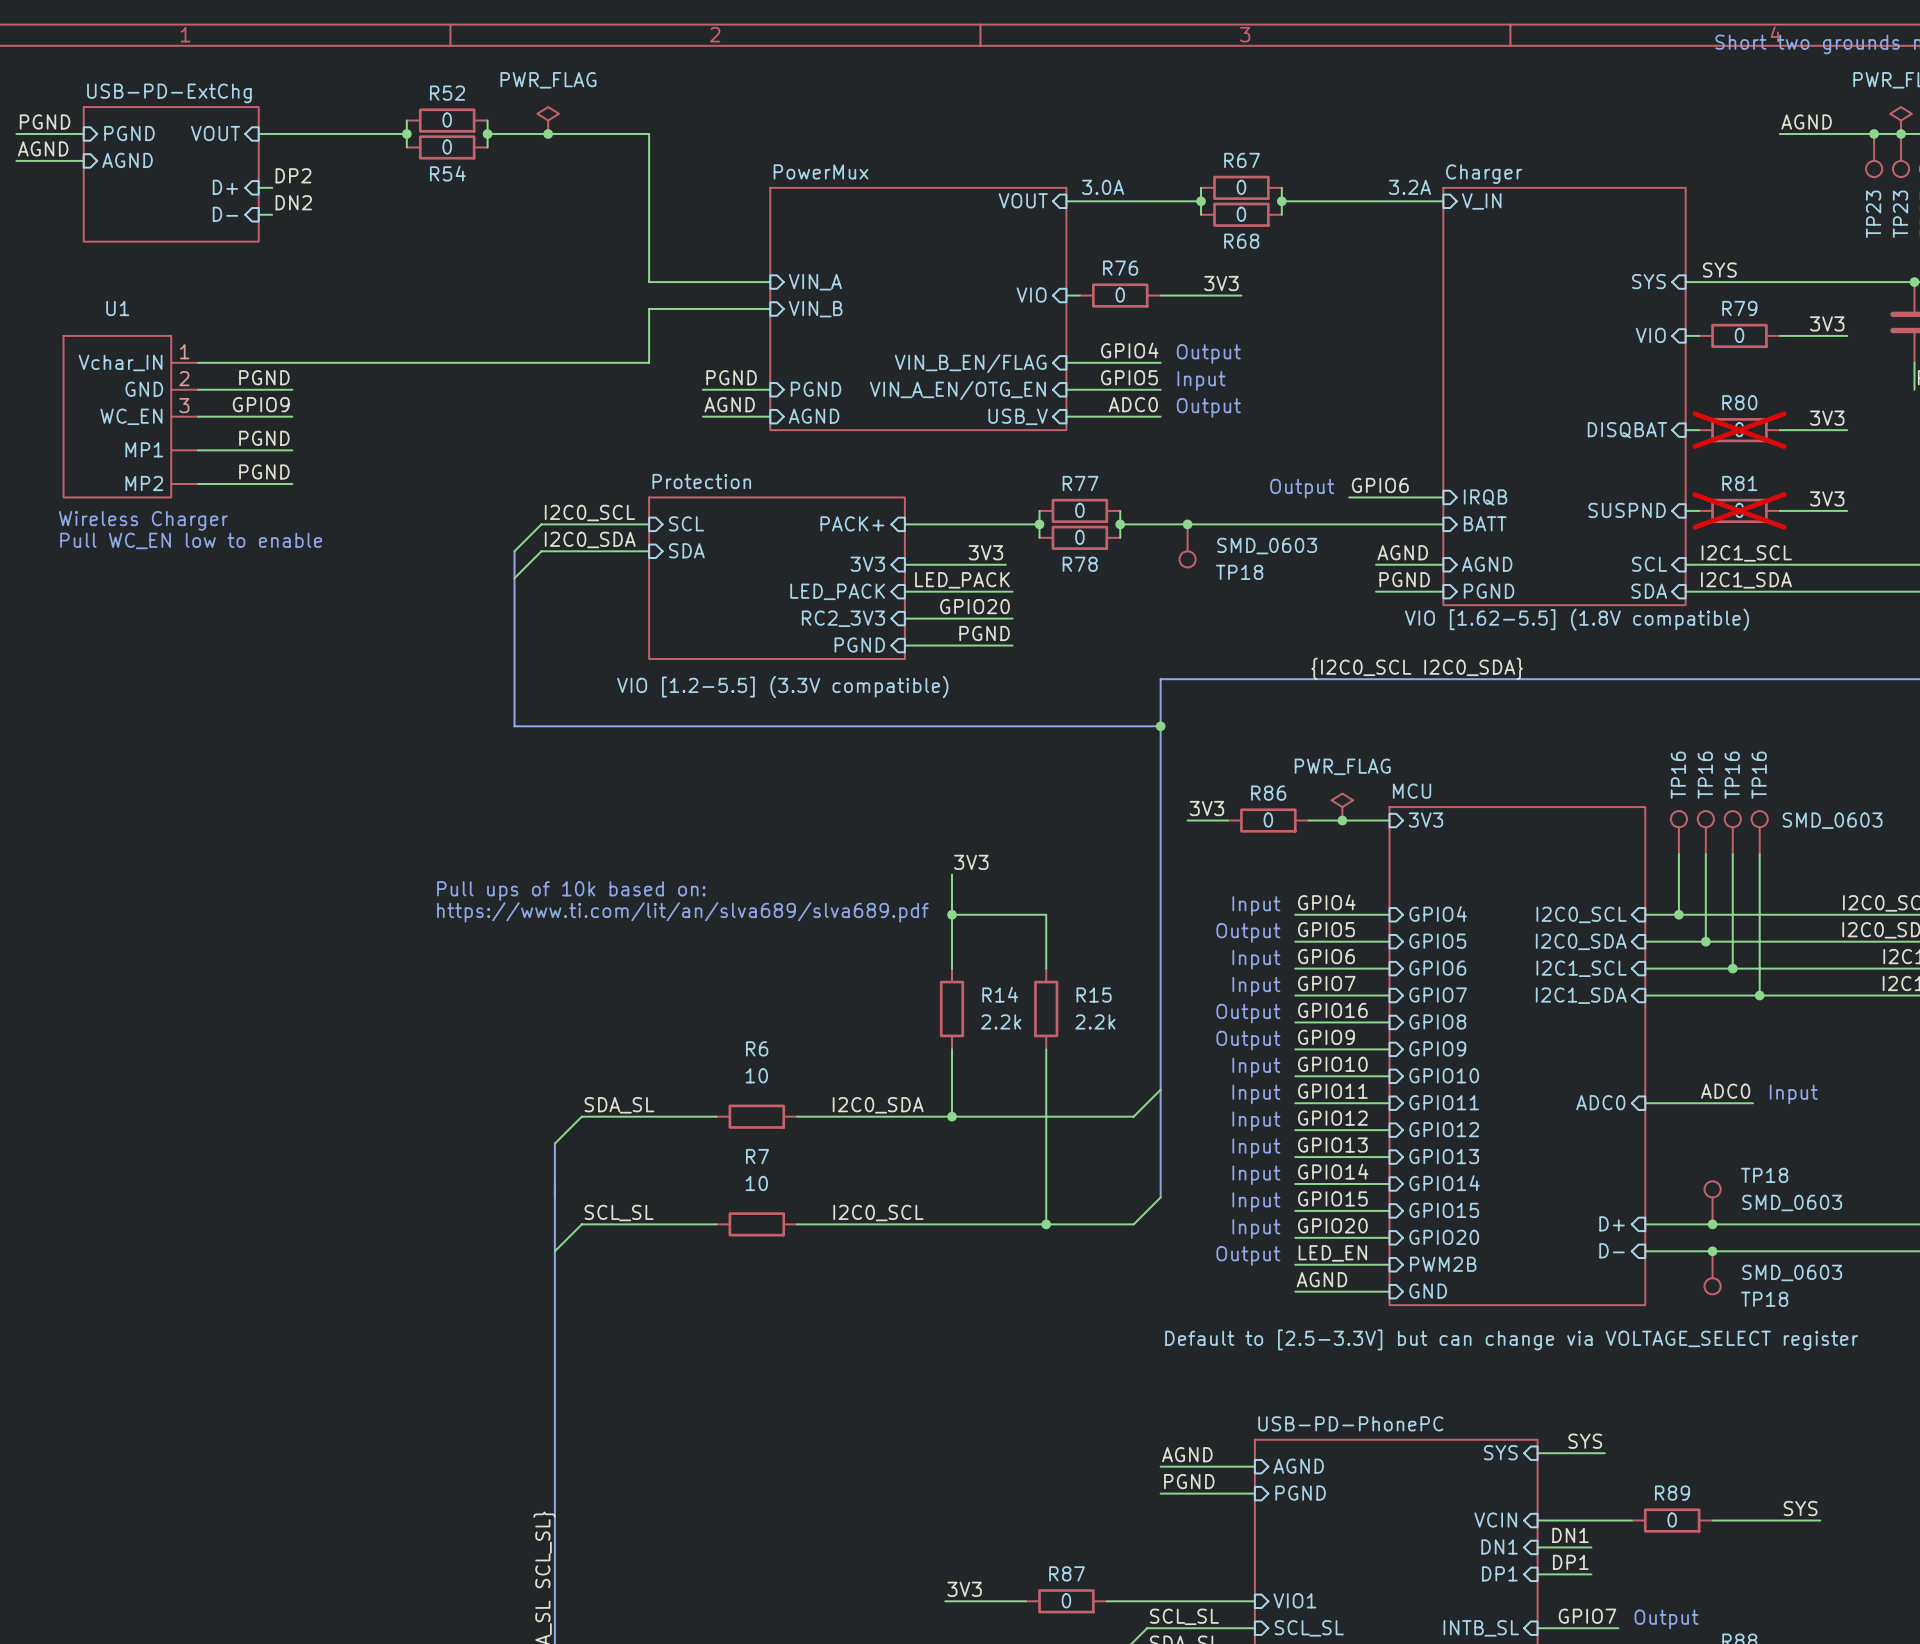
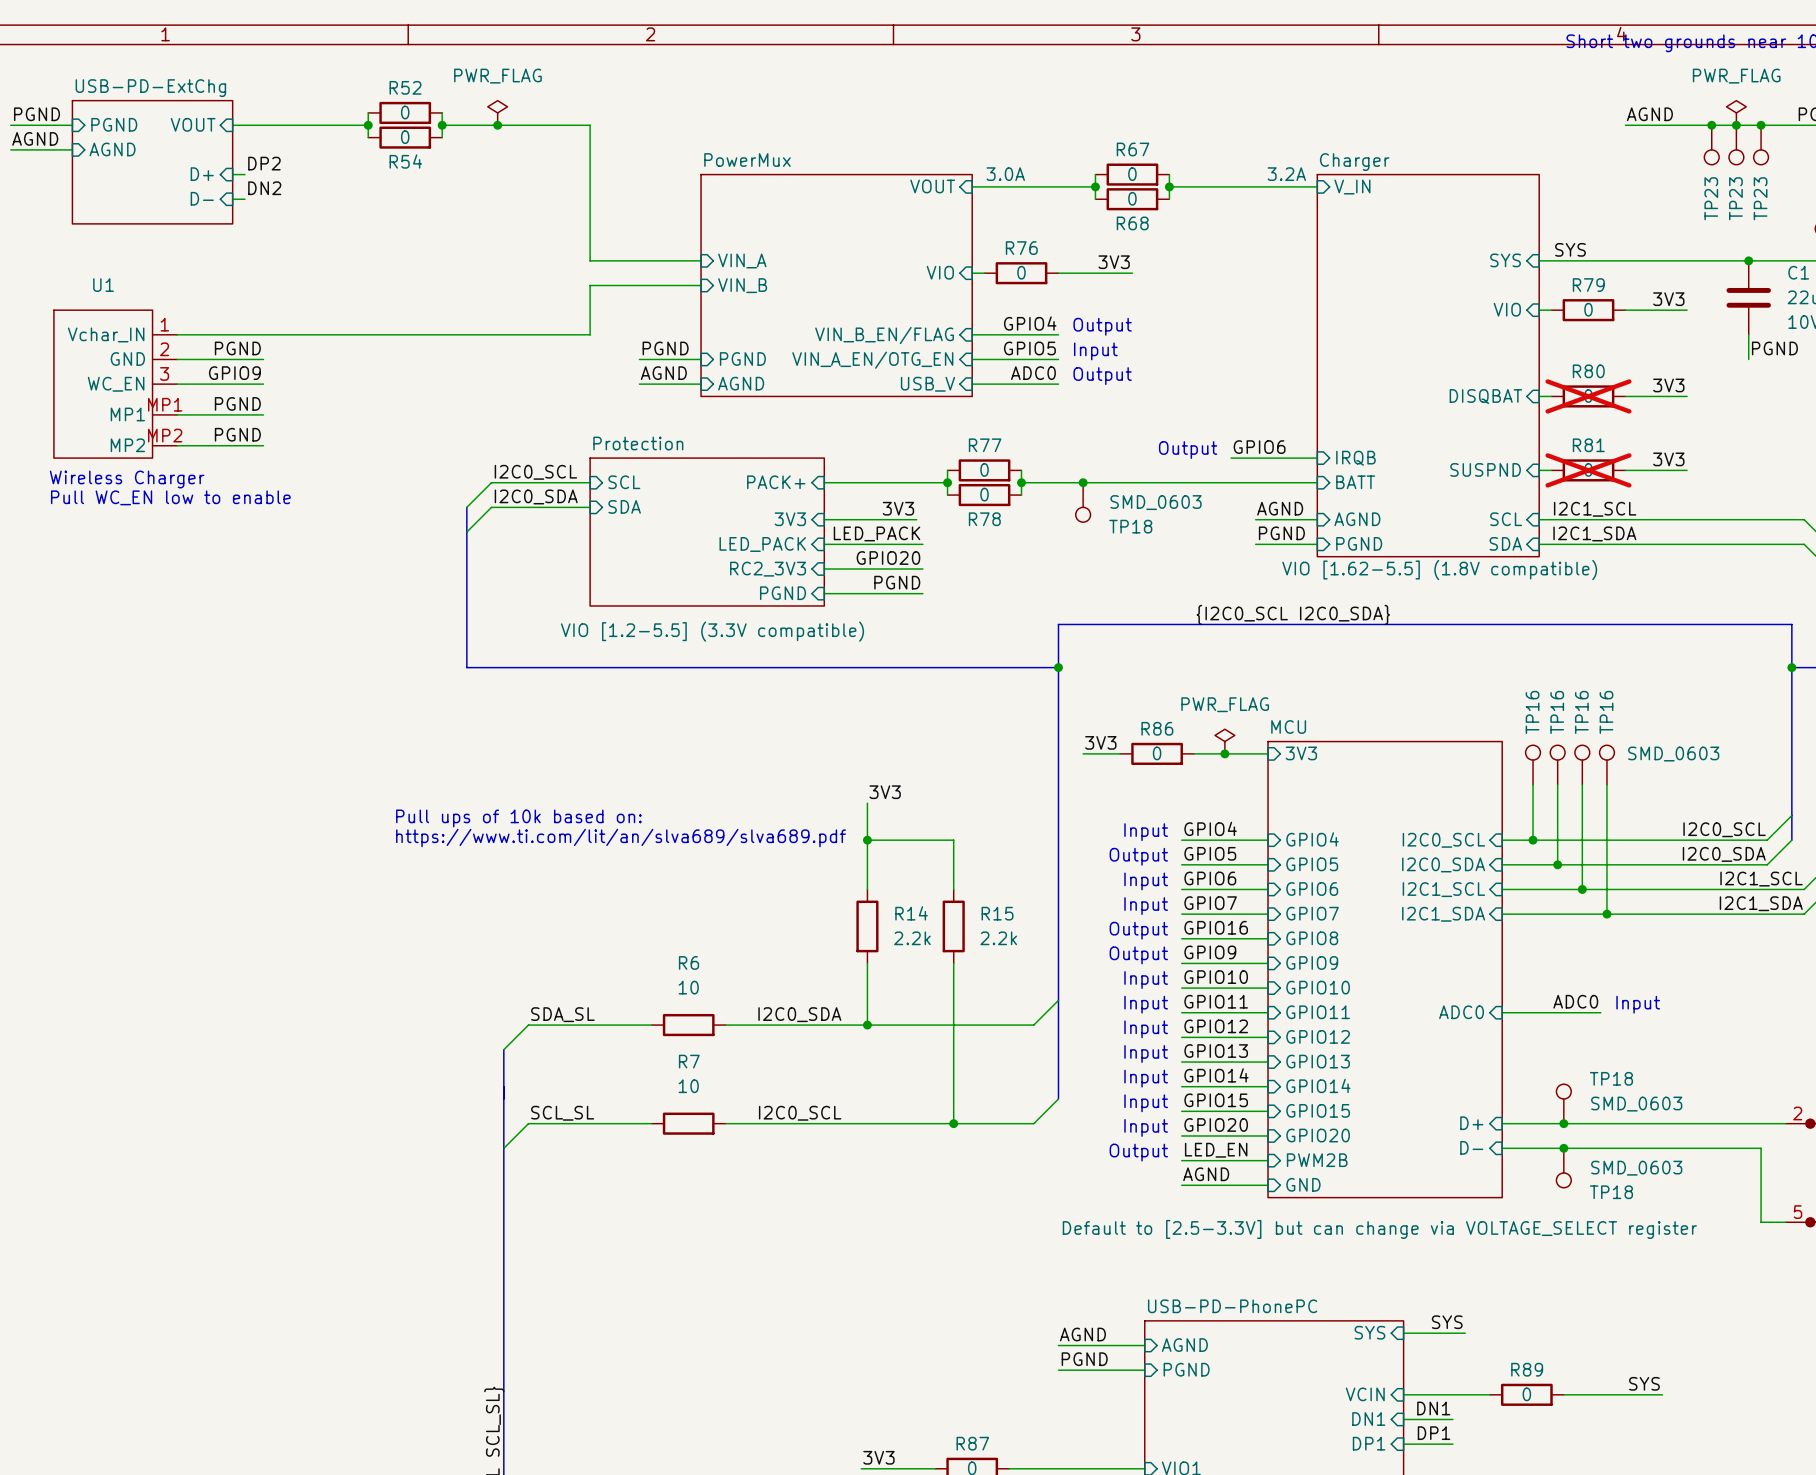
U1 pin number: none -> MP1 (165, 404)
U1 pin number: none -> MP2 (165, 435)

